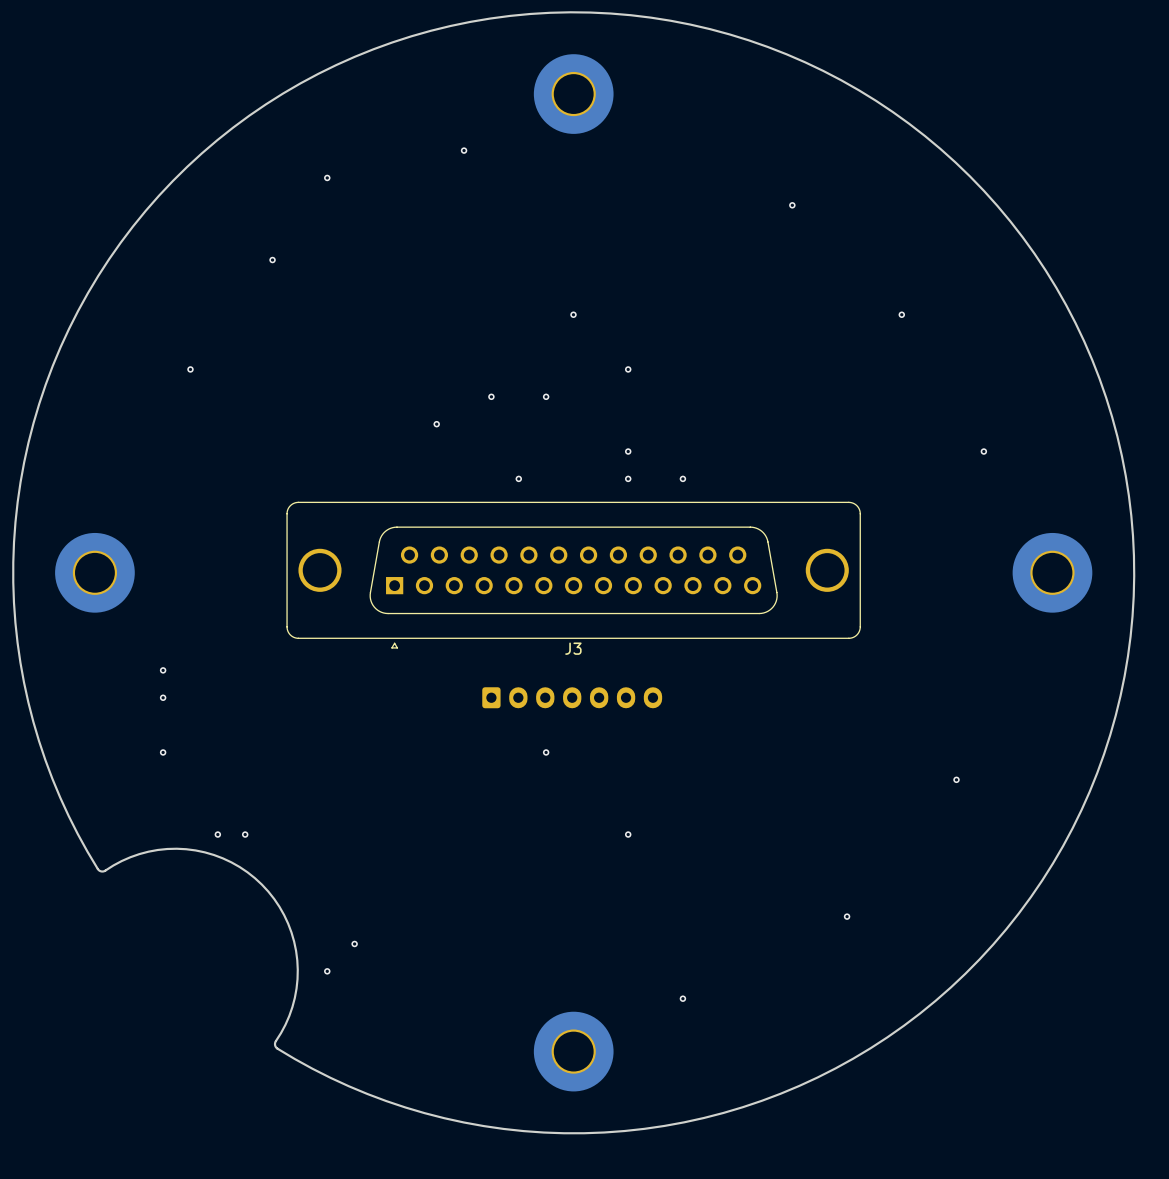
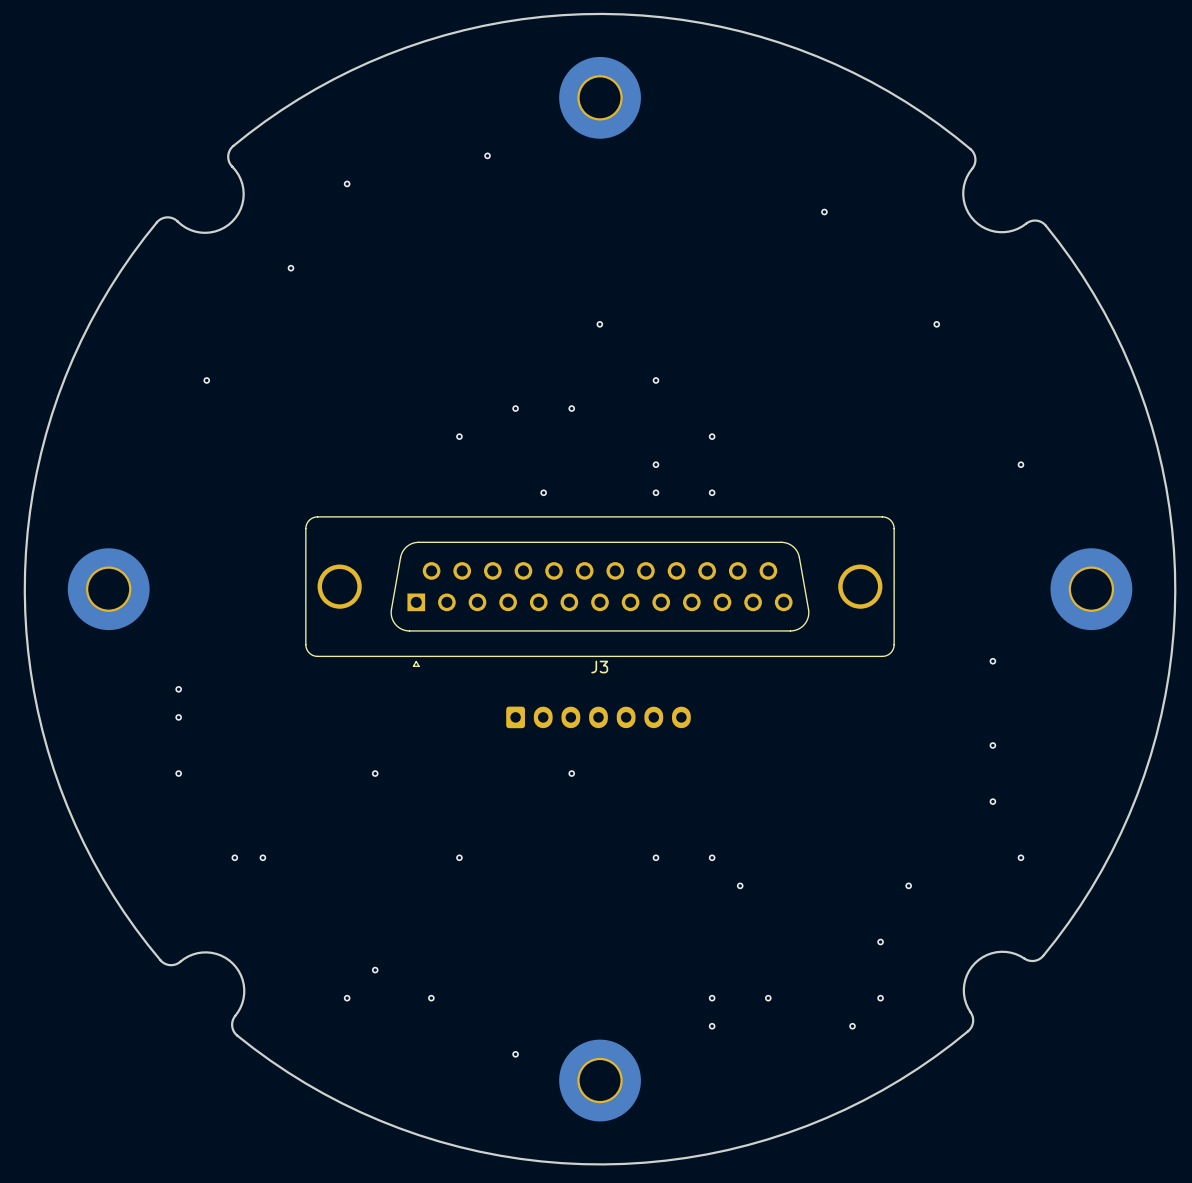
board edge: none -> (232, 166) (228, 157) (232, 147) (281, 110) (350, 70) (406, 47) (463, 30) (522, 19) (582, 14) (642, 15) (701, 23) (760, 36) (816, 56) (871, 81) (922, 112) (972, 151) (975, 162) (965, 181) (963, 195) (968, 213) (977, 223) (985, 228) (999, 232) (1013, 230) (1032, 220) (1040, 221) (1045, 225) (1071, 258) (1104, 311) (1131, 368) (1151, 426) (1166, 487) (1172, 528) (1175, 591) (1171, 653) (1161, 715) (1144, 775) (1120, 833) (1101, 870) (1068, 922) (1040, 958) (1030, 960) (1011, 952) (996, 952) (982, 957) (971, 966) (965, 979) (963, 989) (966, 1003) (973, 1018) (969, 1030) (935, 1056) (882, 1090) (826, 1117) (767, 1139) (727, 1150) (665, 1160) (603, 1164) (541, 1161) (479, 1151) (419, 1135) (360, 1112) (323, 1093) (270, 1060) (235, 1033) (232, 1021) (242, 1003) (244, 989) (240, 975) (229, 960) (216, 953) (206, 952) (192, 954) (173, 965) (161, 961) (135, 928) (102, 878) (75, 825) (60, 787) (42, 730) (33, 691) (26, 631) (25, 571) (29, 512) (41, 453) (51, 414) (73, 358) (100, 304) (144, 238) (160, 219) (170, 217) (177, 221)
board edge: none -> (232, 166) (240, 179) (243, 194) (240, 208) (232, 221) (219, 229) (205, 232) (190, 229) (177, 221)
via: none -> (712, 436)
via: none -> (992, 661)
via: none -> (992, 745)
via: none -> (375, 773)
via: none -> (459, 857)
via: none -> (712, 857)
via: none -> (1020, 857)
via: none -> (740, 885)
via: none -> (908, 885)
board edge: (97, 868) (68, 816) (45, 760) (33, 721) (20, 662) (15, 622) (13, 562) (15, 522) (24, 462) (33, 423) (52, 365) (78, 310) (109, 259) (145, 210) (187, 166) (217, 140) (265, 104) (318, 73) (373, 49) (411, 36) (470, 21) (510, 15) (570, 12) (630, 15) (690, 24) (729, 34) (786, 54) (841, 80) (892, 111) (925, 136) (970, 176) (1010, 221) (1045, 270) (1066, 305) (1092, 359) (1112, 416) (1125, 475) (1131, 515) (1134, 576) (1130, 636) (1120, 695) (1104, 754) (1089, 791) (1063, 846) (1030, 897) (993, 944) (950, 987) (920, 1013) (870, 1048) (835, 1068) (780, 1093) (723, 1112) (664, 1125) (604, 1132) (543, 1132) (483, 1126) (444, 1118) (405, 1107) (348, 1086) (312, 1068) (276, 1047) (275, 1042) (285, 1024) (294, 997) (297, 969) (296, 950) (288, 923) (279, 906) (261, 884) (247, 872) (213, 855) (176, 848) (148, 851) (121, 861) (104, 871) (97, 868) -> none
via: none -> (431, 998)
via: none -> (712, 998)
via: none -> (768, 998)
via: none -> (880, 998)
via: none -> (852, 1026)
via: none -> (515, 1054)

